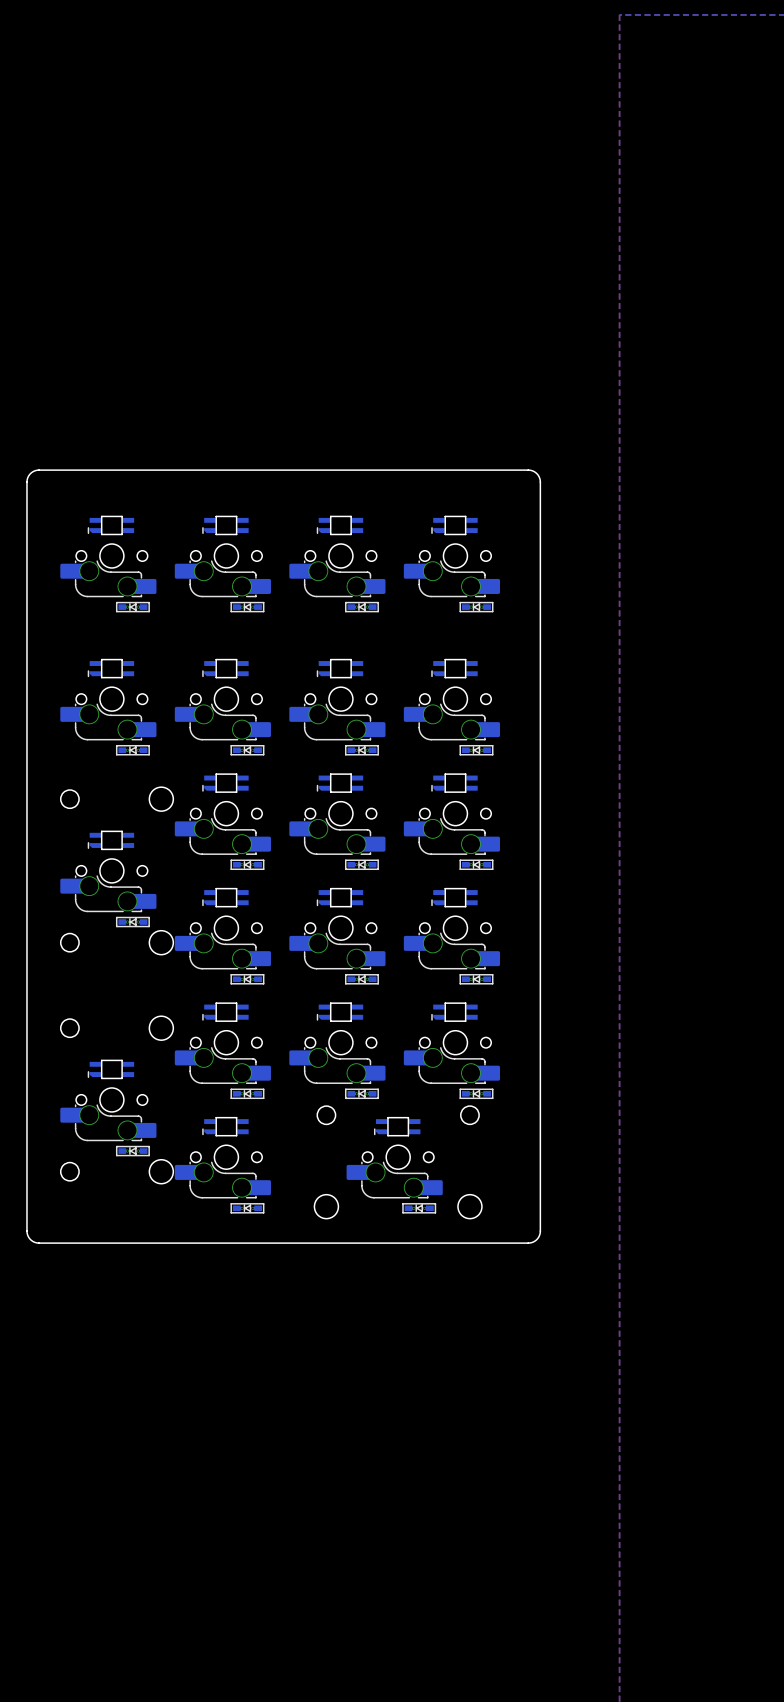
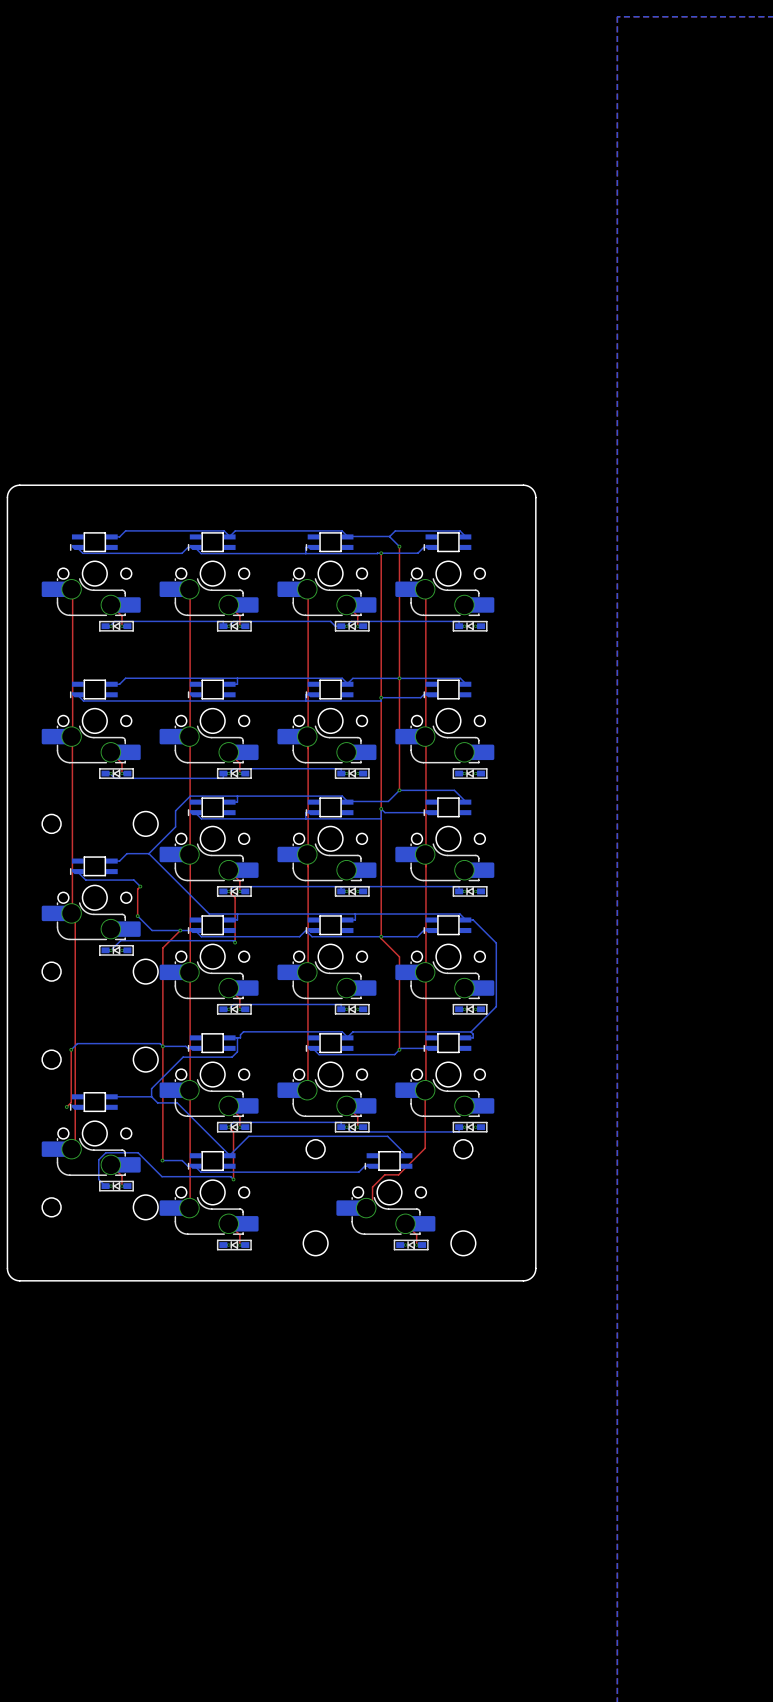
bottom track: none -> (229, 536) (224, 530) (125, 530) (119, 536) (111, 536)
bottom track: none -> (347, 536) (342, 530) (235, 530) (229, 536)
bottom track: none -> (389, 536) (399, 546)
bottom track: none -> (389, 536) (347, 536)
bottom track: none -> (389, 536) (395, 530) (460, 530) (465, 536)
top track: none -> (399, 546) (399, 790)
via: none -> (399, 546)
bottom track: none -> (313, 547) (305, 547) (305, 553)
bottom track: none -> (431, 547) (423, 547) (417, 553) (377, 553) (201, 553) (195, 547) (187, 547) (182, 553) (82, 553) (77, 547)
top track: none -> (381, 553) (381, 938) (399, 956) (399, 1049)
via: none -> (381, 553)
top track: none -> (71, 589) (71, 913) (75, 917) (75, 1145) (71, 1149)
top track: none -> (189, 589) (189, 1208)
top track: none -> (307, 589) (307, 1090)
top track: none -> (425, 589) (425, 1148) (398, 1174) (384, 1174) (372, 1187) (372, 1201) (366, 1208)
top track: none -> (110, 604) (121, 616) (121, 626)
top track: none -> (228, 604) (239, 616) (239, 626)
top track: none -> (346, 604) (357, 616) (357, 626)
bottom track: none -> (464, 626) (459, 626) (459, 621) (351, 621) (346, 626) (335, 626) (330, 621) (233, 621) (228, 626) (223, 626) (223, 621) (114, 621) (110, 626)
bottom track: none -> (237, 678) (237, 684) (229, 684)
via: none -> (399, 678)
bottom track: none -> (347, 683) (342, 678) (125, 678) (119, 684) (111, 684)
bottom track: none -> (347, 683) (352, 678) (460, 678) (465, 684)
bottom track: none -> (313, 694) (305, 694) (305, 700)
bottom track: none -> (431, 694) (423, 694) (420, 697) (381, 697) (381, 700) (83, 700) (77, 694)
via: none -> (381, 697)
top track: none -> (110, 752) (121, 763) (121, 773)
top track: none -> (228, 752) (239, 763) (239, 773)
bottom track: none -> (346, 773) (341, 773) (341, 768) (233, 768) (228, 773) (223, 773) (223, 778) (114, 778) (110, 773)
via: none -> (399, 790)
bottom track: none -> (237, 796) (237, 802) (229, 802)
bottom track: none -> (347, 801) (342, 796) (190, 796) (175, 810) (175, 826) (148, 853)
bottom track: none -> (347, 801) (388, 801) (399, 790) (454, 790) (465, 802)
via: none -> (381, 808)
bottom track: none -> (313, 812) (305, 812) (305, 818)
bottom track: none -> (431, 812) (384, 812) (381, 808) (381, 818) (201, 818) (195, 812)
bottom track: none -> (148, 853) (209, 914) (459, 914) (465, 920) (473, 920) (496, 943) (496, 1006) (470, 1031)
bottom track: none -> (148, 853) (127, 853) (119, 861) (111, 861)
top track: none -> (228, 870) (239, 881) (239, 891)
bottom track: none -> (77, 871) (85, 880) (133, 880) (140, 886)
top track: none -> (140, 886) (137, 889) (137, 916)
via: none -> (140, 886)
bottom track: none -> (341, 887) (459, 886) (459, 891) (464, 891)
top track: none -> (228, 891) (235, 897) (235, 942)
bottom track: none -> (346, 891) (341, 891) (341, 886) (233, 886) (228, 891) (223, 891)
bottom track: none -> (237, 914) (237, 920) (229, 920)
bottom track: none -> (355, 914) (355, 920) (347, 920)
bottom track: none -> (137, 916) (152, 930) (195, 930) (201, 936) (299, 936) (305, 930) (312, 936) (417, 936) (423, 930) (431, 930)
via: none -> (137, 916)
top track: none -> (180, 930) (162, 947) (162, 1160)
via: none -> (180, 930)
via: none -> (381, 936)
bottom track: none -> (235, 940) (235, 942) (233, 940) (120, 940) (110, 950) (105, 950)
via: none -> (235, 942)
top track: none -> (228, 988) (239, 999) (239, 1009)
bottom track: none -> (346, 1009) (341, 1009) (341, 1004) (233, 1004) (228, 1009) (223, 1009)
bottom track: none -> (470, 1031) (352, 1031) (347, 1037)
bottom track: none -> (470, 1031) (473, 1037) (465, 1037)
bottom track: none -> (347, 1037) (342, 1031) (243, 1031) (240, 1037) (229, 1037)
bottom track: none -> (237, 1037) (237, 1051) (232, 1057) (183, 1057) (151, 1088) (151, 1096)
via: none -> (162, 1046)
bottom track: none -> (195, 1048) (162, 1046) (160, 1043) (77, 1043) (71, 1049)
bottom track: none -> (431, 1048) (400, 1048) (394, 1054) (319, 1054) (313, 1048)
top track: none -> (71, 1049) (71, 1102) (66, 1107)
via: none -> (71, 1049)
via: none -> (399, 1049)
bottom track: none -> (151, 1096) (157, 1102) (177, 1102) (229, 1155)
bottom track: none -> (151, 1096) (111, 1096)
top track: none -> (228, 1105) (239, 1117) (239, 1127)
top track: none -> (346, 1105) (357, 1117) (357, 1127)
via: none -> (66, 1107)
top track: none -> (228, 1127) (233, 1131) (233, 1179)
bottom track: none -> (464, 1127) (459, 1127) (459, 1131) (351, 1131) (346, 1127) (341, 1127) (341, 1122) (233, 1122) (228, 1127) (223, 1127)
bottom track: none -> (229, 1155) (248, 1136) (387, 1136) (406, 1155)
bottom track: none -> (162, 1160) (182, 1160) (187, 1166) (195, 1166) (200, 1172) (358, 1172) (364, 1166) (372, 1166)
via: none -> (162, 1160)
top track: none -> (110, 1164) (121, 1175) (121, 1186)
bottom track: none -> (233, 1179) (230, 1176) (162, 1176) (138, 1152) (105, 1152) (98, 1159) (98, 1179) (105, 1186) (110, 1186)
via: none -> (233, 1179)
top track: none -> (228, 1223) (239, 1234) (239, 1245)
top track: none -> (405, 1223) (416, 1234) (416, 1245)

